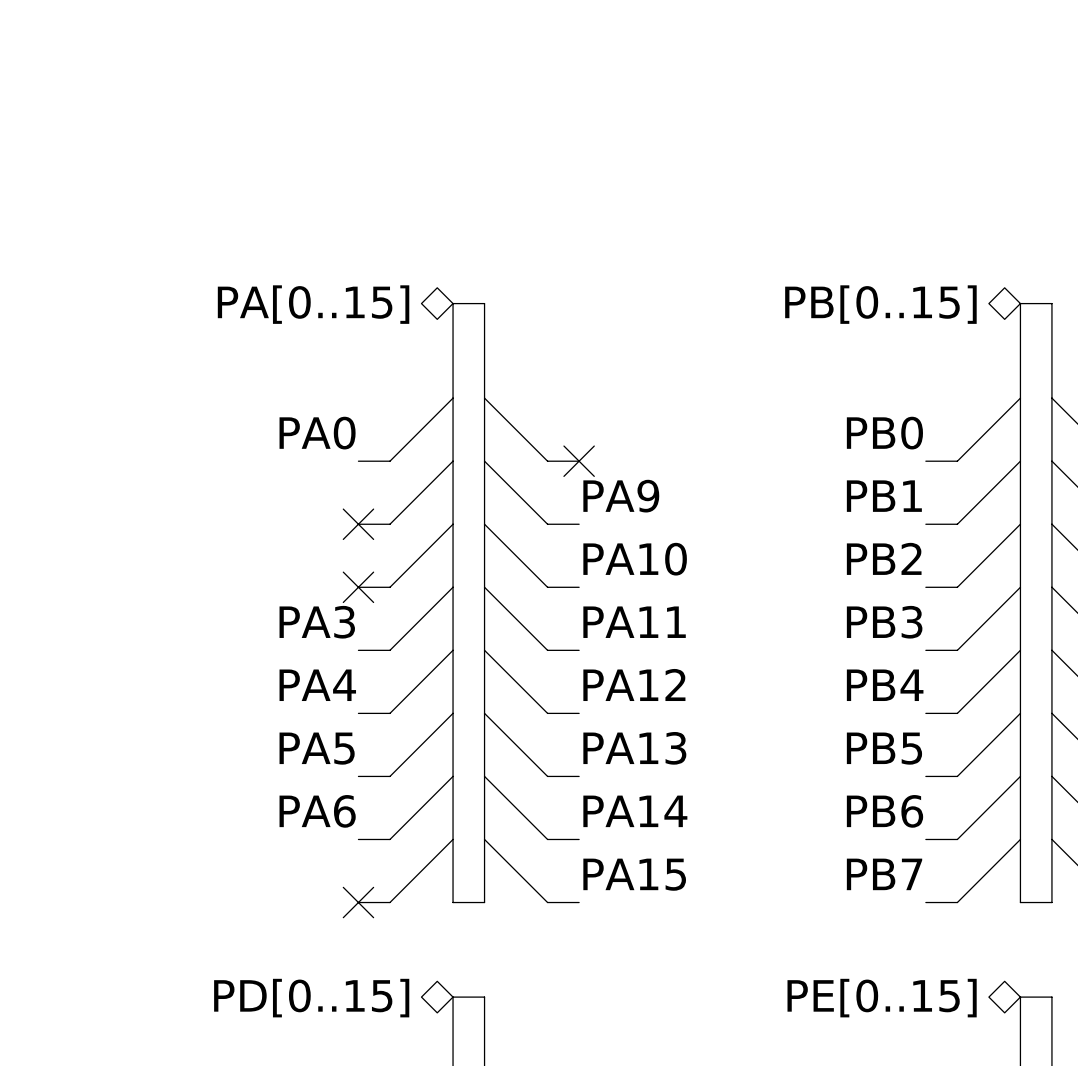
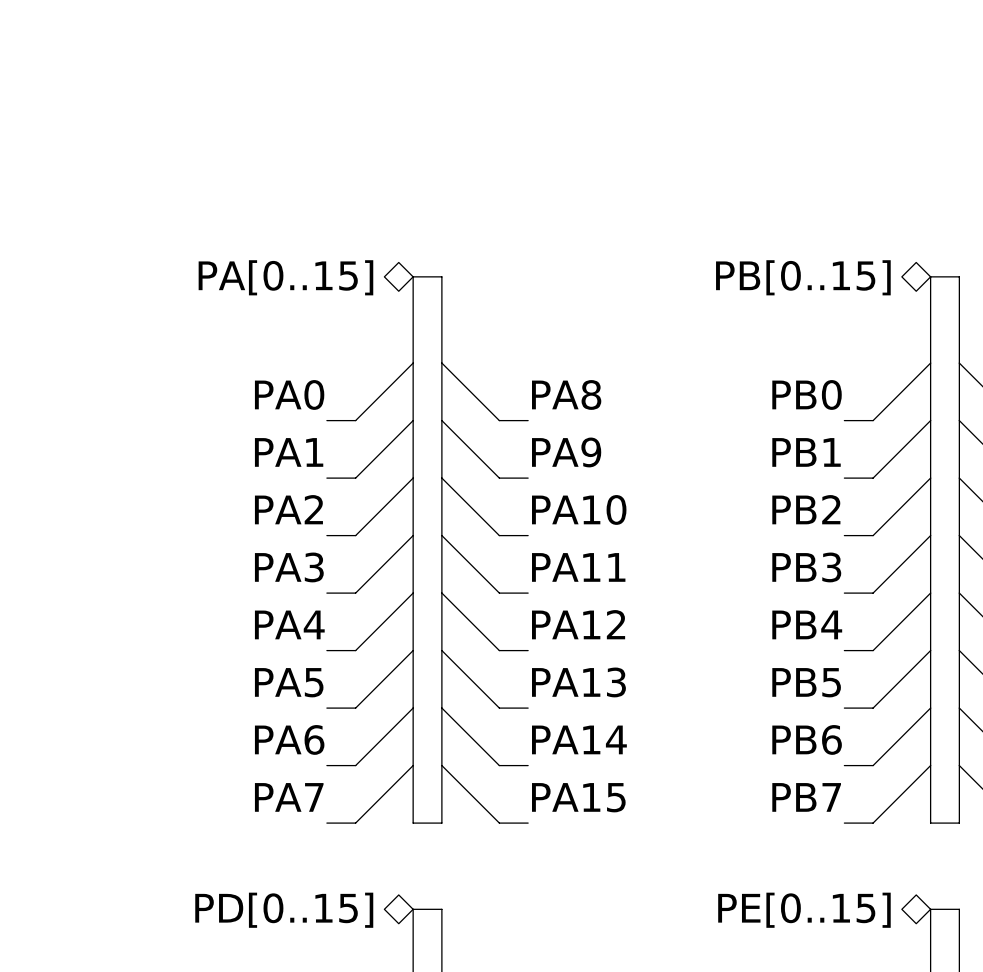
label: none -> PA8 (566, 394)
no-connect mark: (579, 461) -> none
label: none -> PA1 (289, 452)
no-connect mark: (358, 524) -> none
label: none -> PA2 (288, 509)
no-connect mark: (358, 587) -> none
label: none -> PA7 (289, 797)
no-connect mark: (358, 902) -> none

